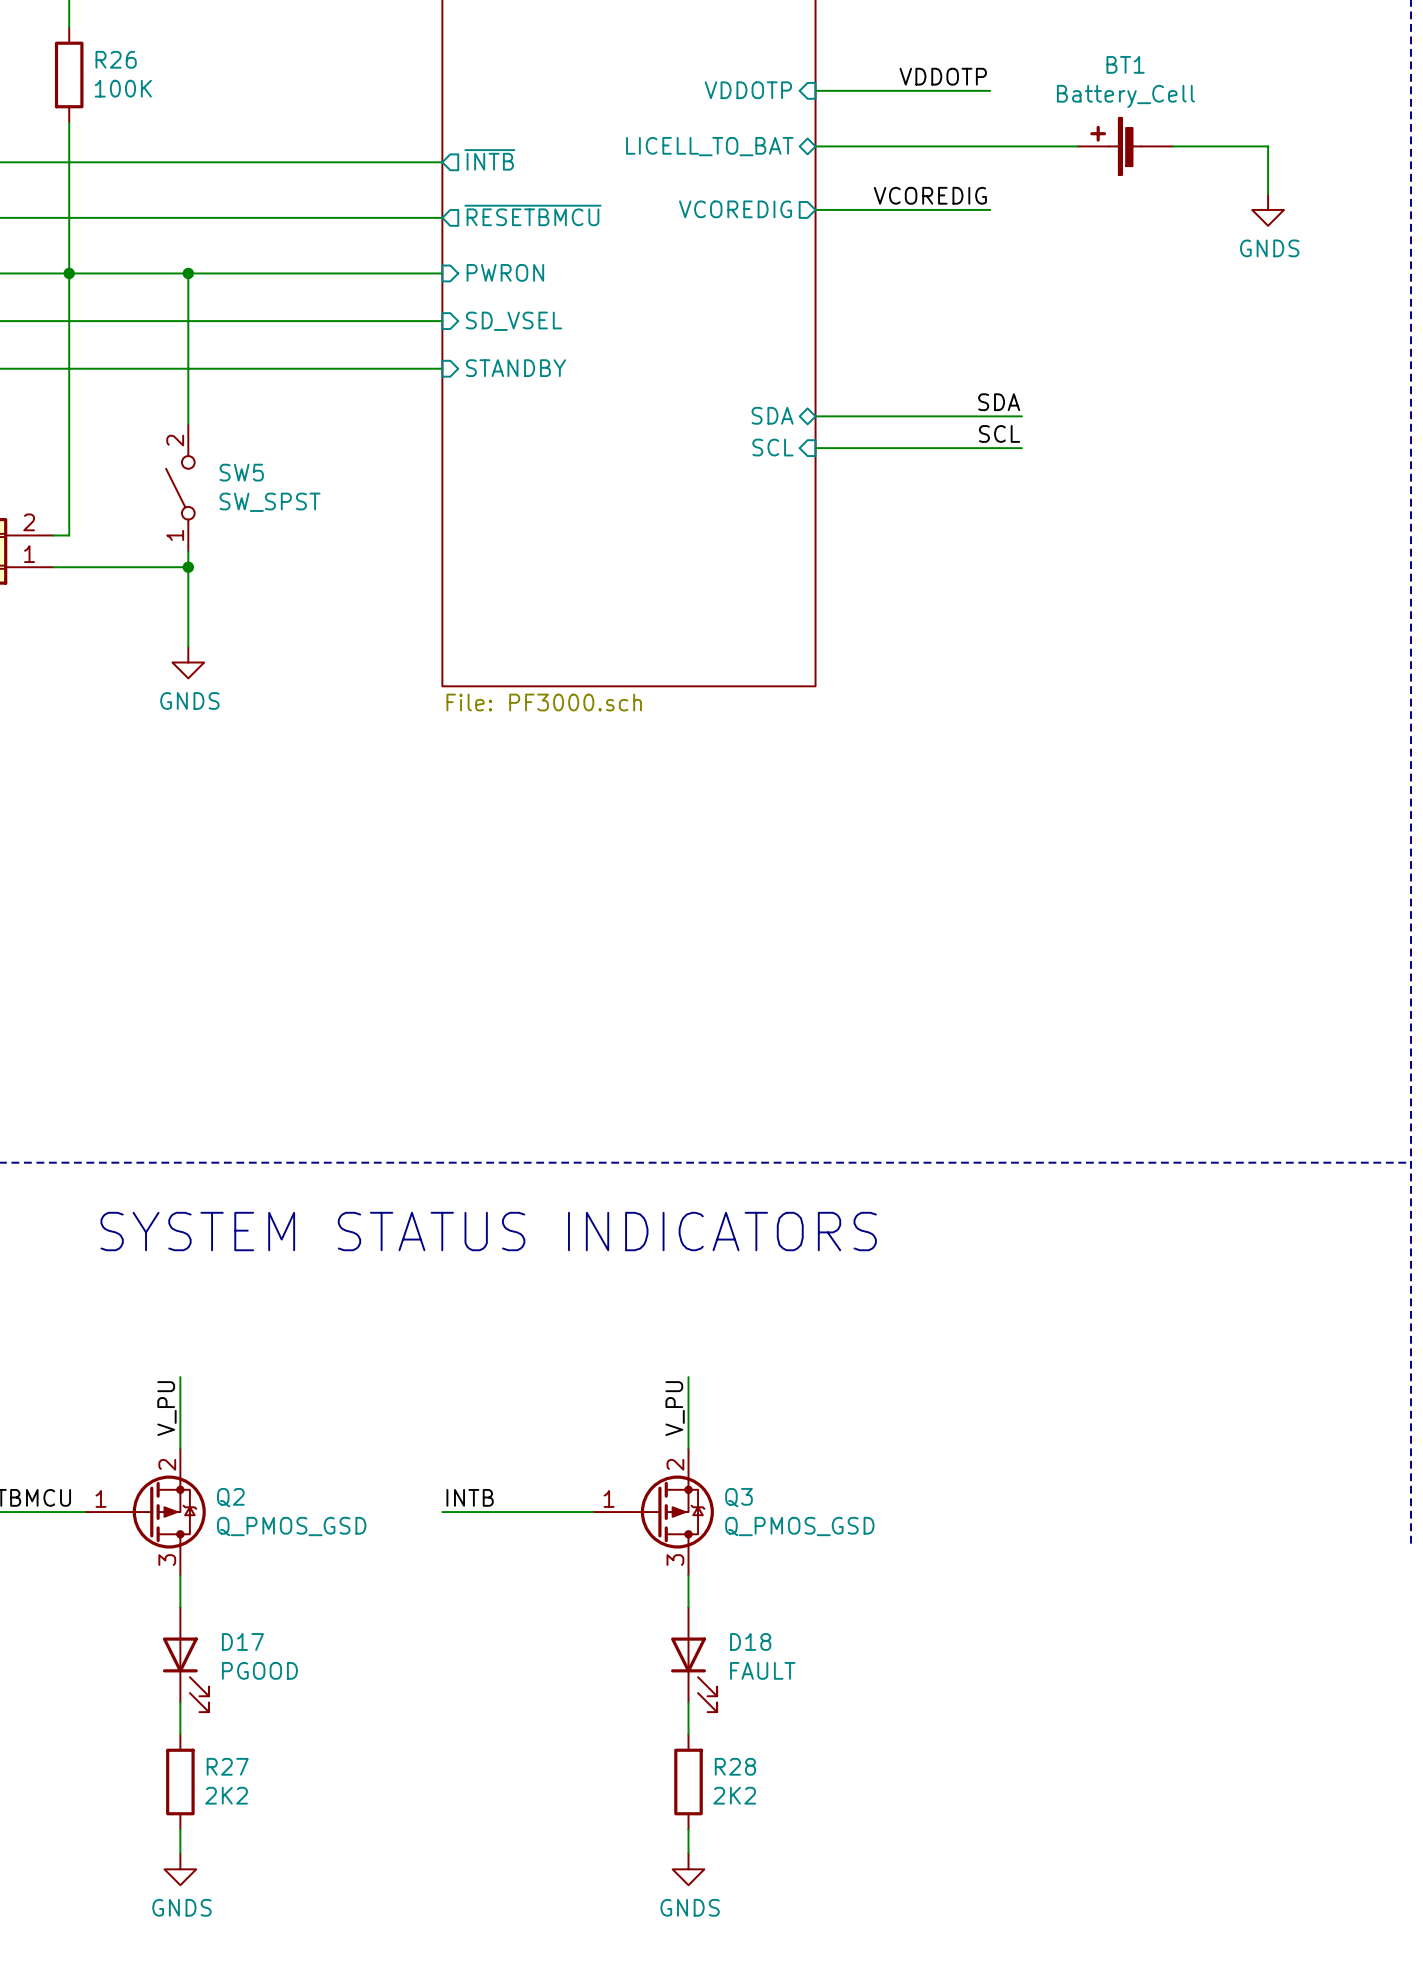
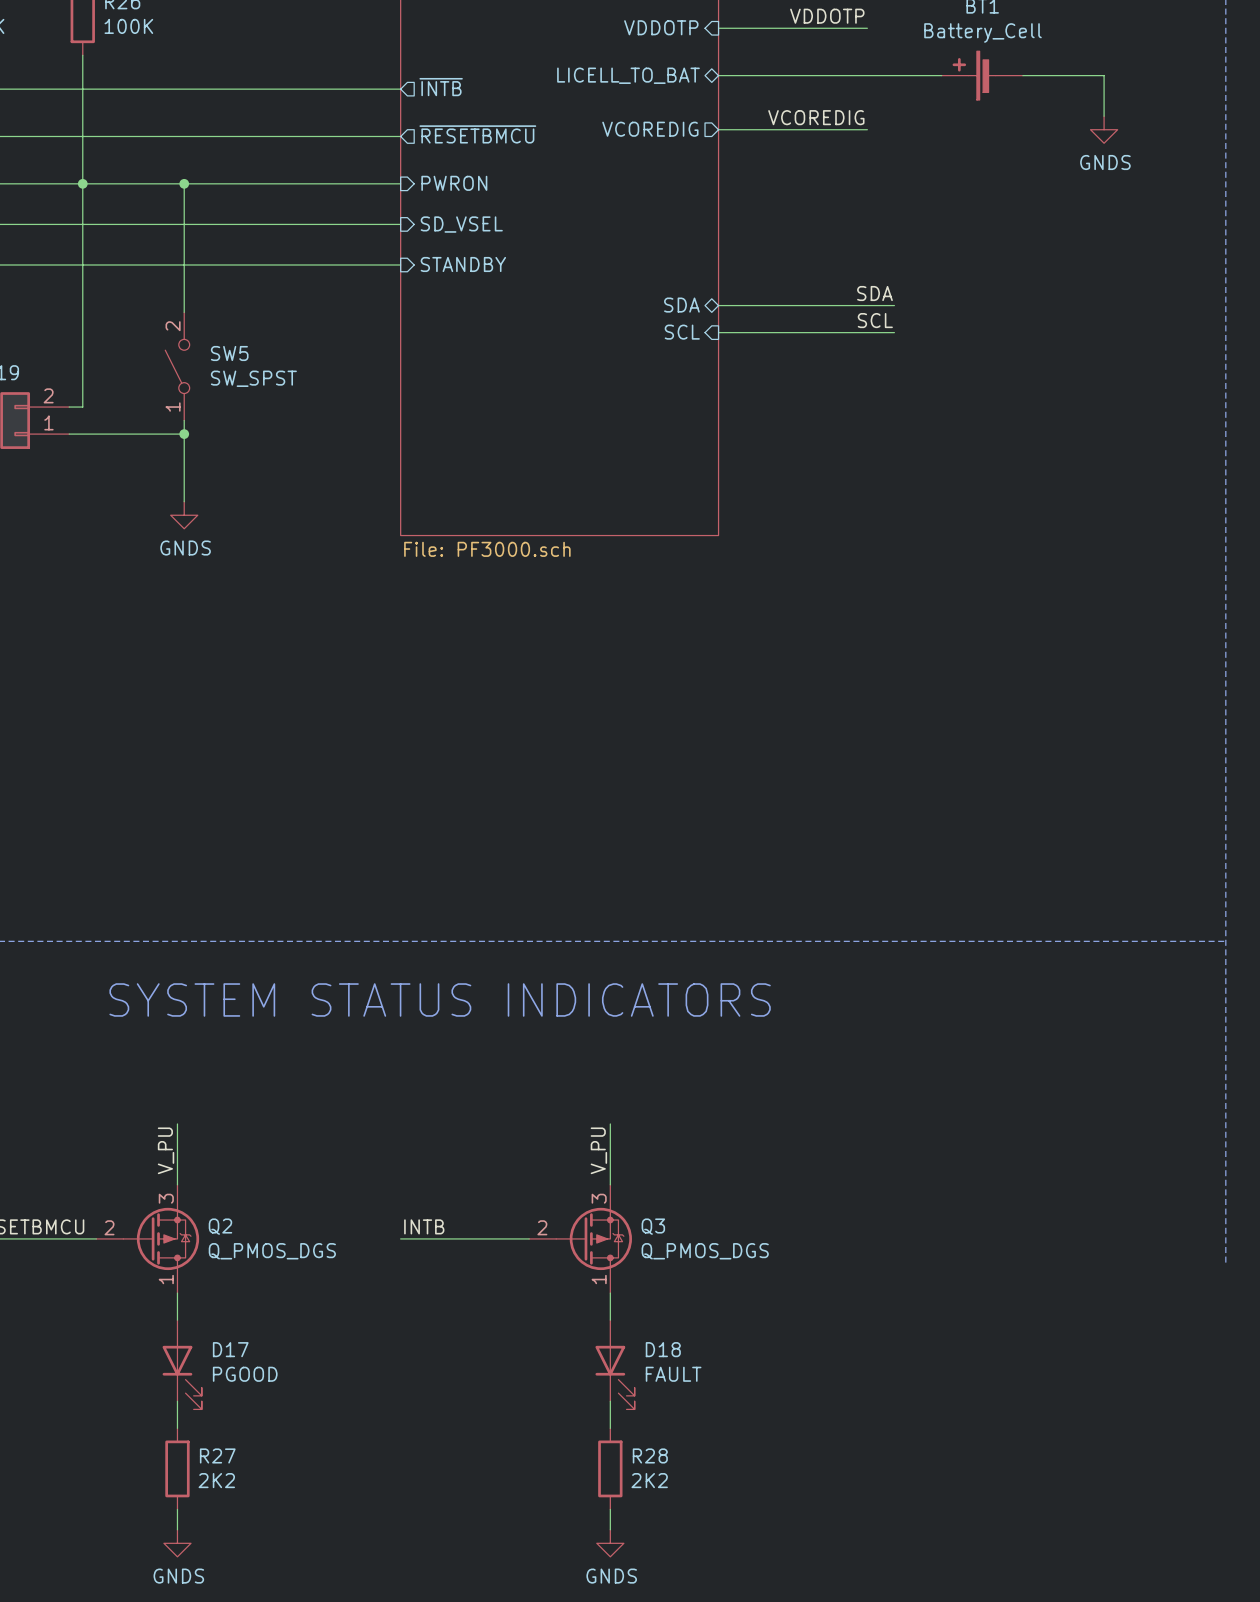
Q2 pin number: 2 (167, 1464) -> 3 (166, 1198)
Q3 pin number: 2 (675, 1464) -> 3 (599, 1198)
Q2 pin number: 1 (100, 1498) -> 2 (109, 1227)
Q3 pin number: 1 (609, 1498) -> 2 (542, 1227)
Q2 value: Q_PMOS_GSD (291, 1526) -> Q_PMOS_DGS (272, 1251)
Q3 value: Q_PMOS_GSD (799, 1526) -> Q_PMOS_DGS (705, 1251)
Q2 pin number: 3 (167, 1560) -> 1 (166, 1279)
Q3 pin number: 3 (675, 1560) -> 1 (599, 1279)

